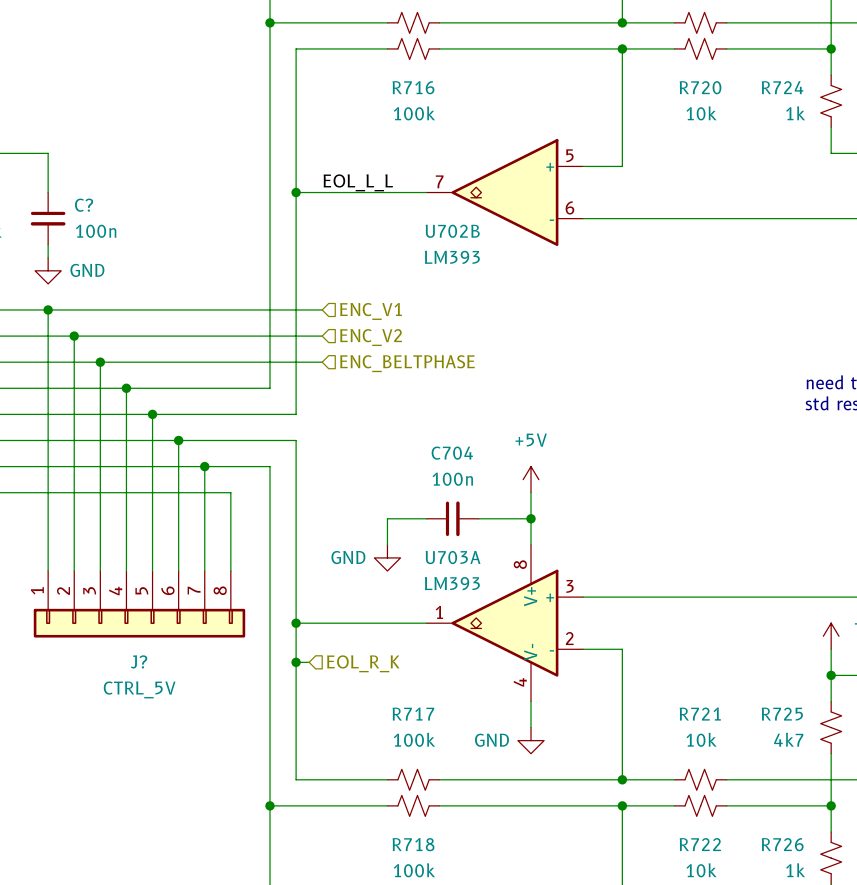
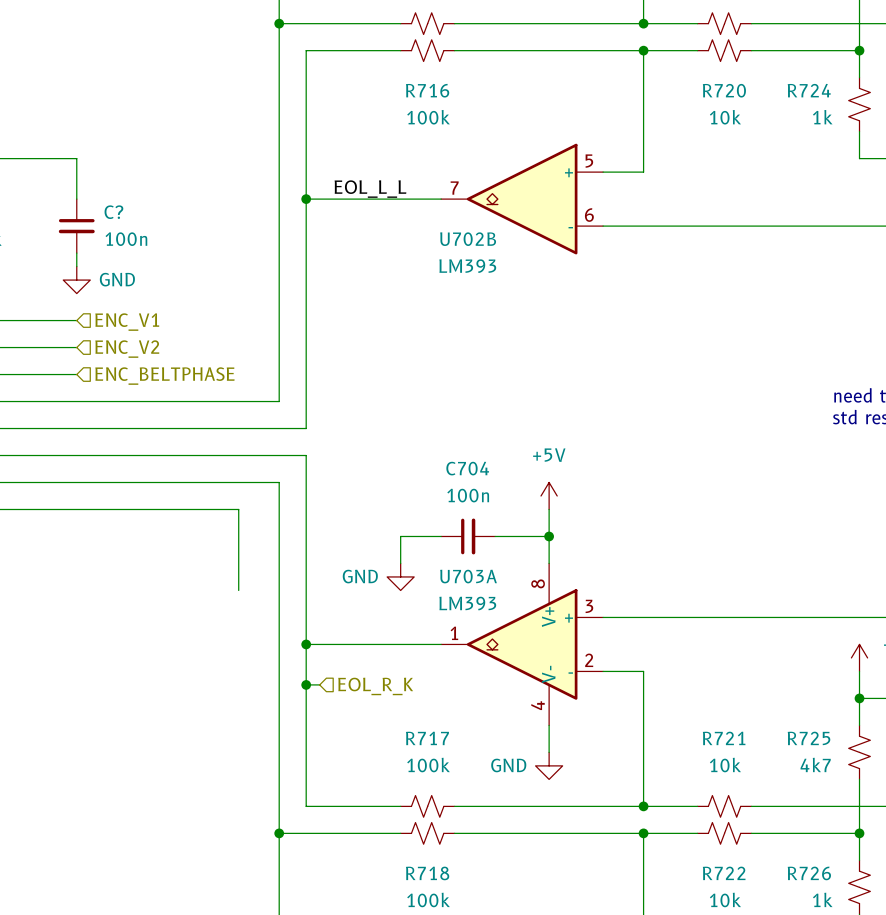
wire: (48, 153) (48, 192) -> (49, 158) (76, 158) (76, 199)
C? position: (48, 218) -> (76, 226)
wire: (48, 244) (48, 257) -> (76, 253) (76, 266)
power symbol position: GND (48, 270) -> GND (76, 280)
wire: (48, 309) (48, 570) -> none
junction: (48, 309) -> none
wire: (74, 309) (322, 309) -> none
hierarchical label position: ENC_V1 (371, 311) -> ENC_V1 (127, 322)
junction: (74, 336) -> none
wire: (322, 336) (74, 336) (74, 570) -> none
hierarchical label position: ENC_V2 (371, 337) -> ENC_V2 (127, 349)
wire: (74, 362) (322, 362) -> none
wire: (100, 362) (100, 570) -> none
junction: (100, 362) -> none
hierarchical label position: ENC_BELTPHASE (407, 363) -> ENC_BELTPHASE (164, 376)
wire: (126, 388) (126, 570) -> none
junction: (126, 388) -> none
wire: (152, 414) (152, 570) -> none
junction: (152, 414) -> none
wire: (178, 440) (178, 570) -> none
junction: (178, 440) -> none
wire: (204, 466) (204, 570) -> none
junction: (204, 466) -> none
J?: CTRL_5V (139, 604) -> none

